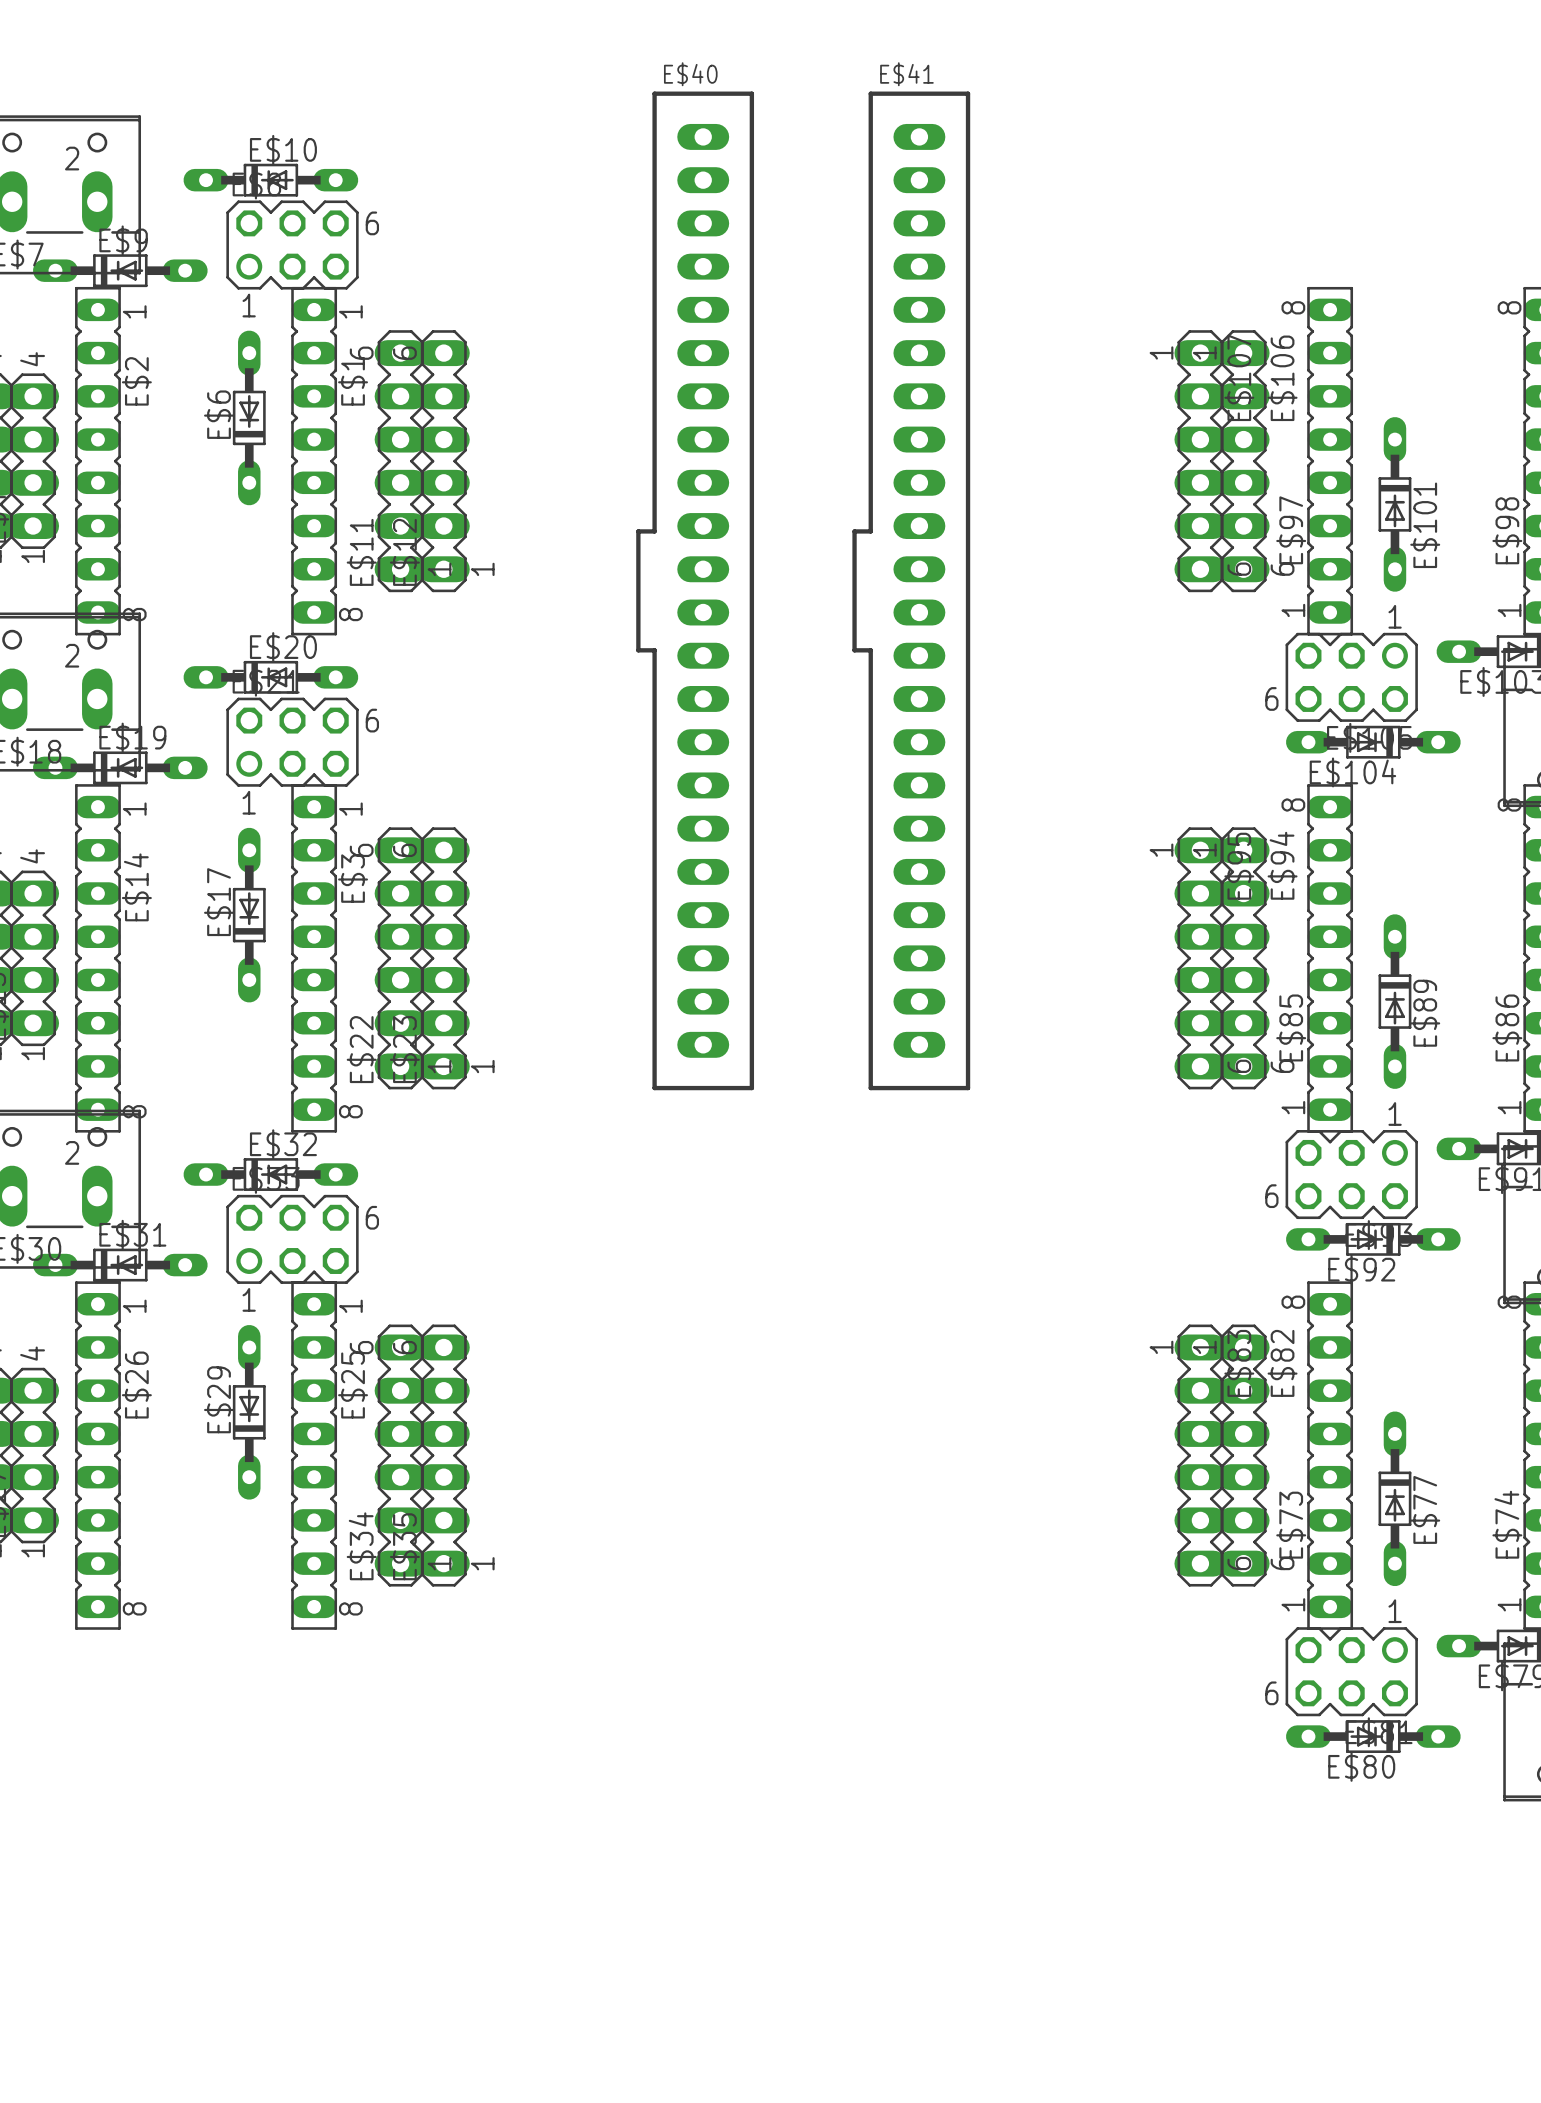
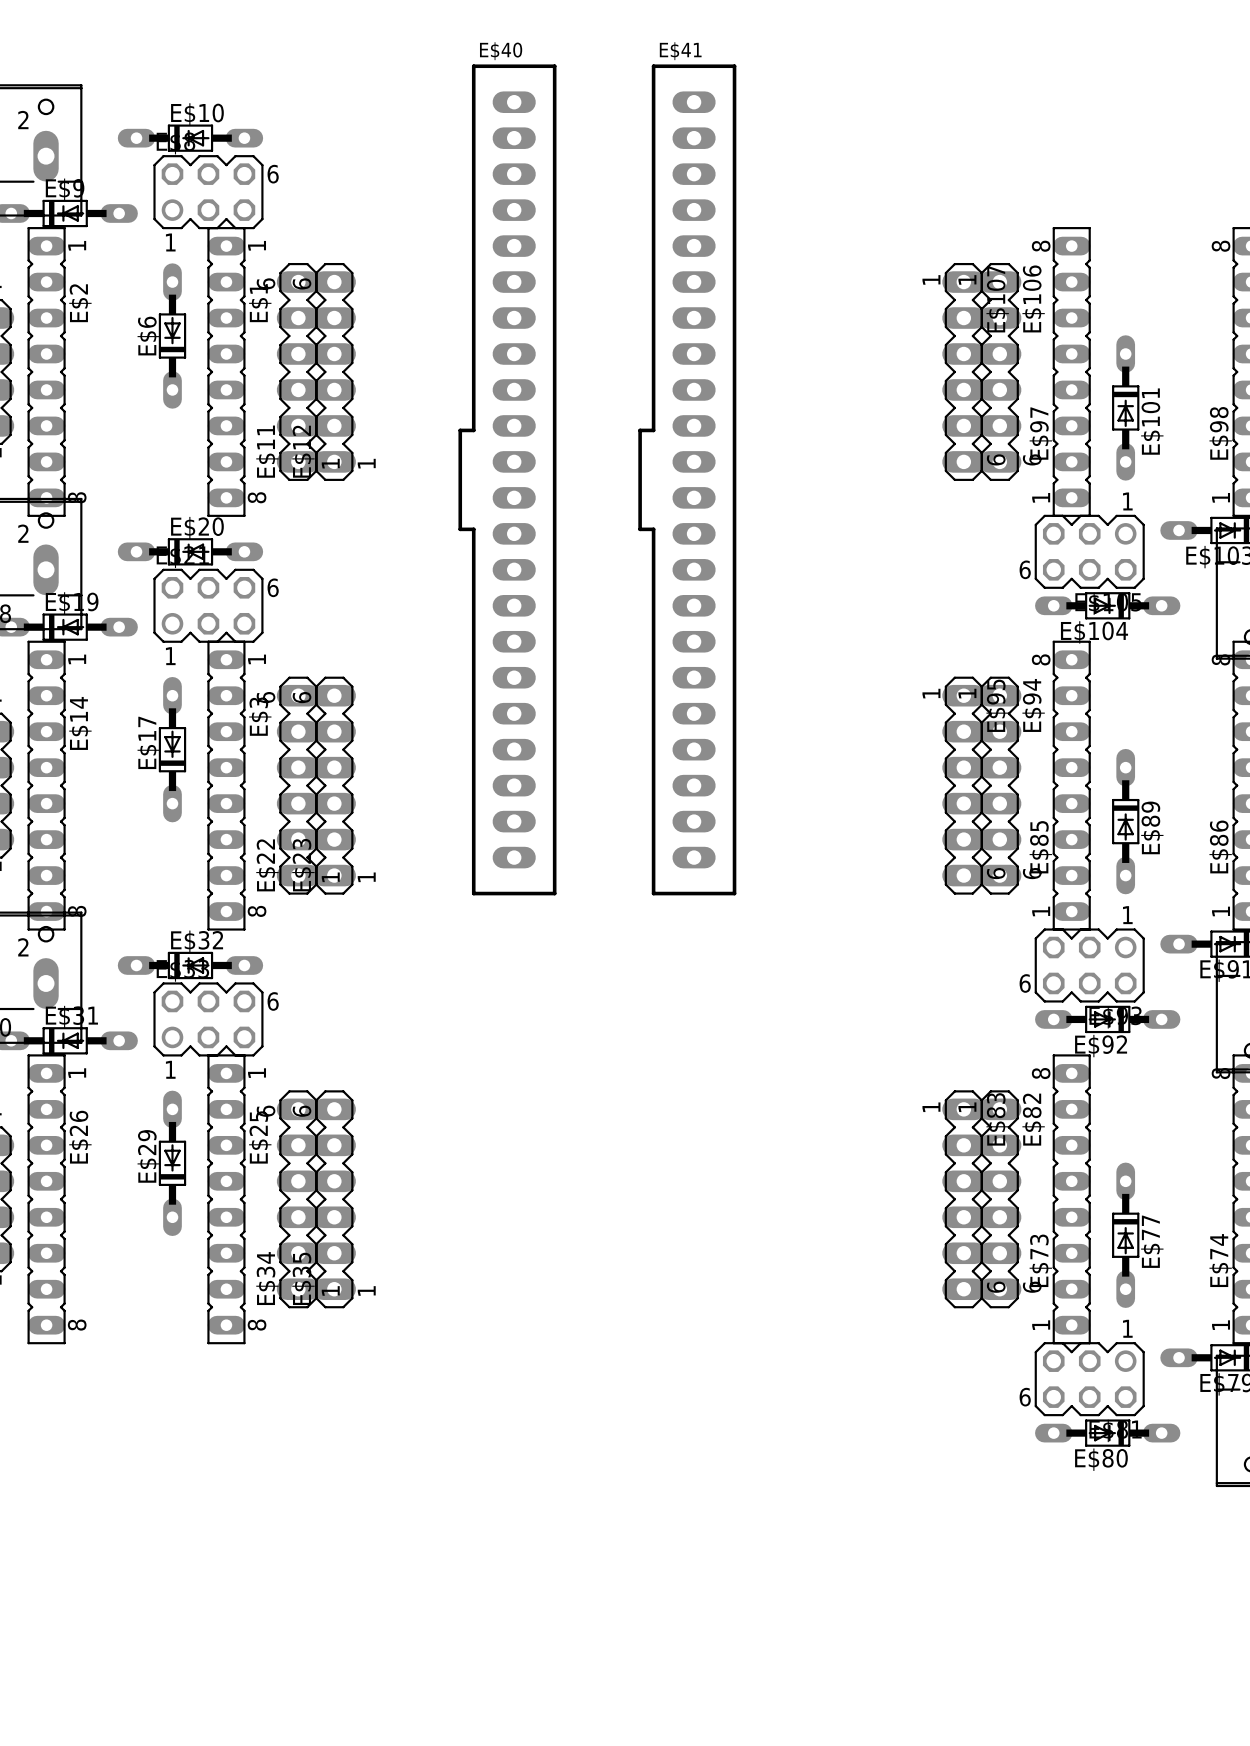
E$40 position: (695, 590) -> (507, 479)
E$41 position: (911, 590) -> (687, 479)

